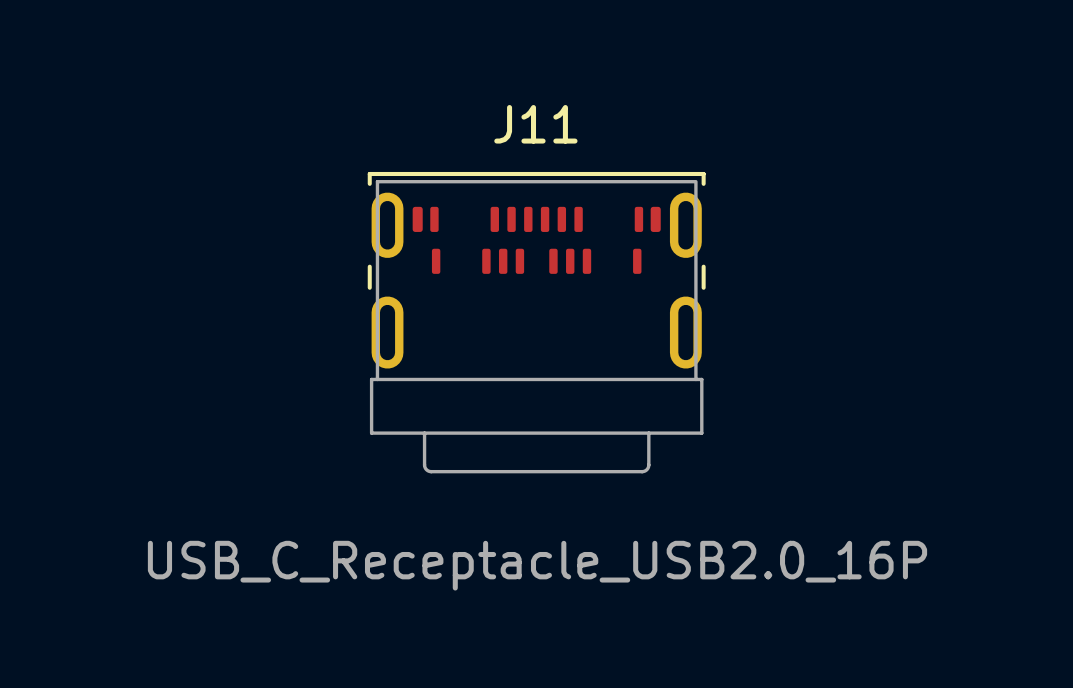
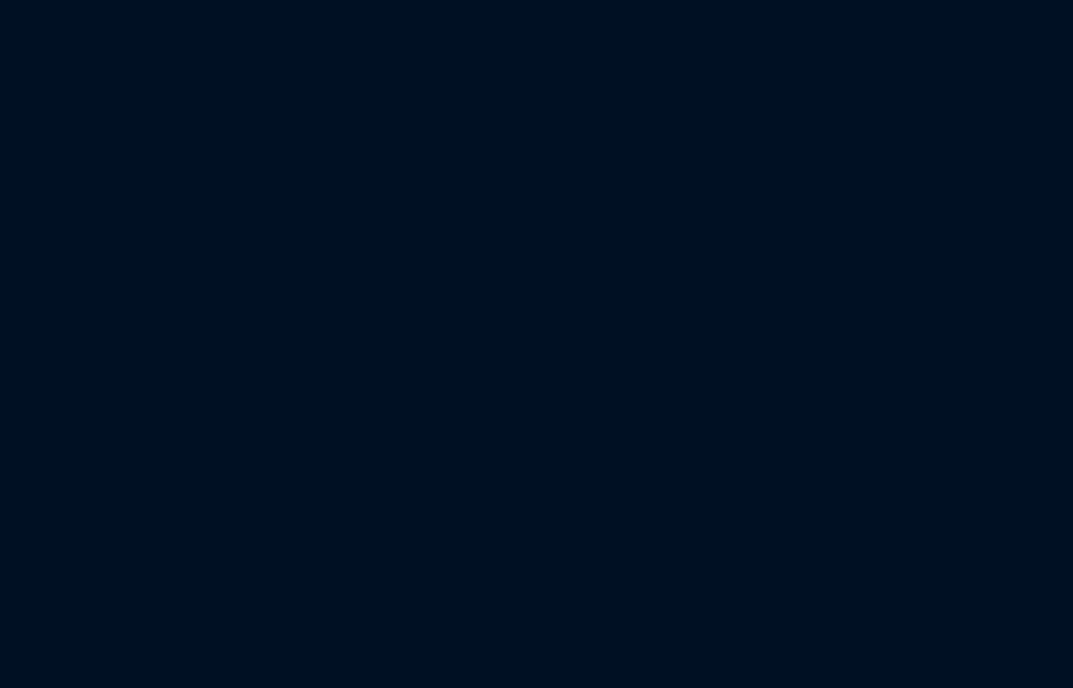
J11: USB_C_Receptacle_USB2.0_16P (536, 322) -> none

